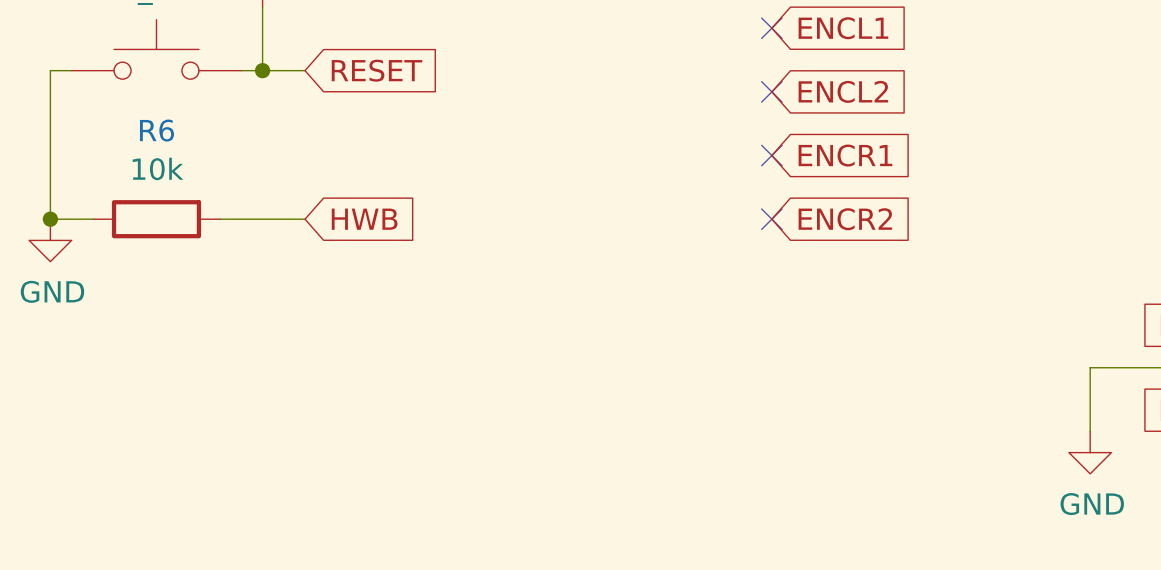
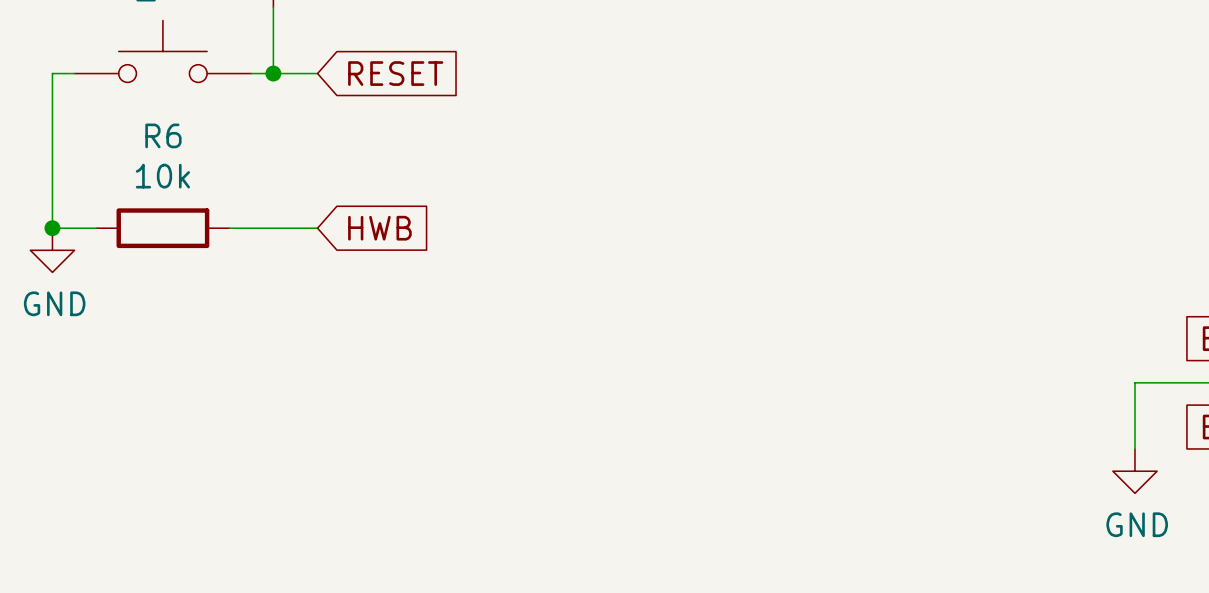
no-connect mark: (771, 28) -> none
global label: ENCL1 (843, 28) -> none
no-connect mark: (771, 91) -> none
global label: ENCL2 (843, 91) -> none
no-connect mark: (771, 155) -> none
global label: ENCR1 (845, 155) -> none
no-connect mark: (771, 219) -> none
global label: ENCR2 (845, 219) -> none

